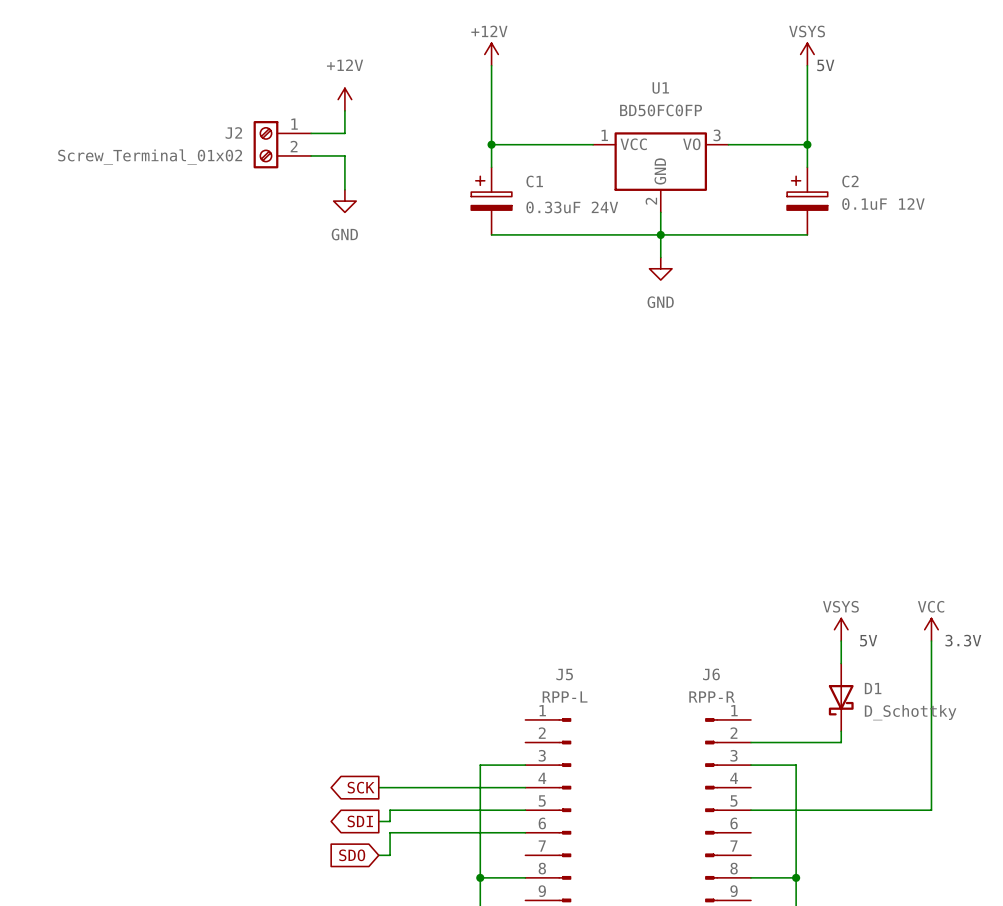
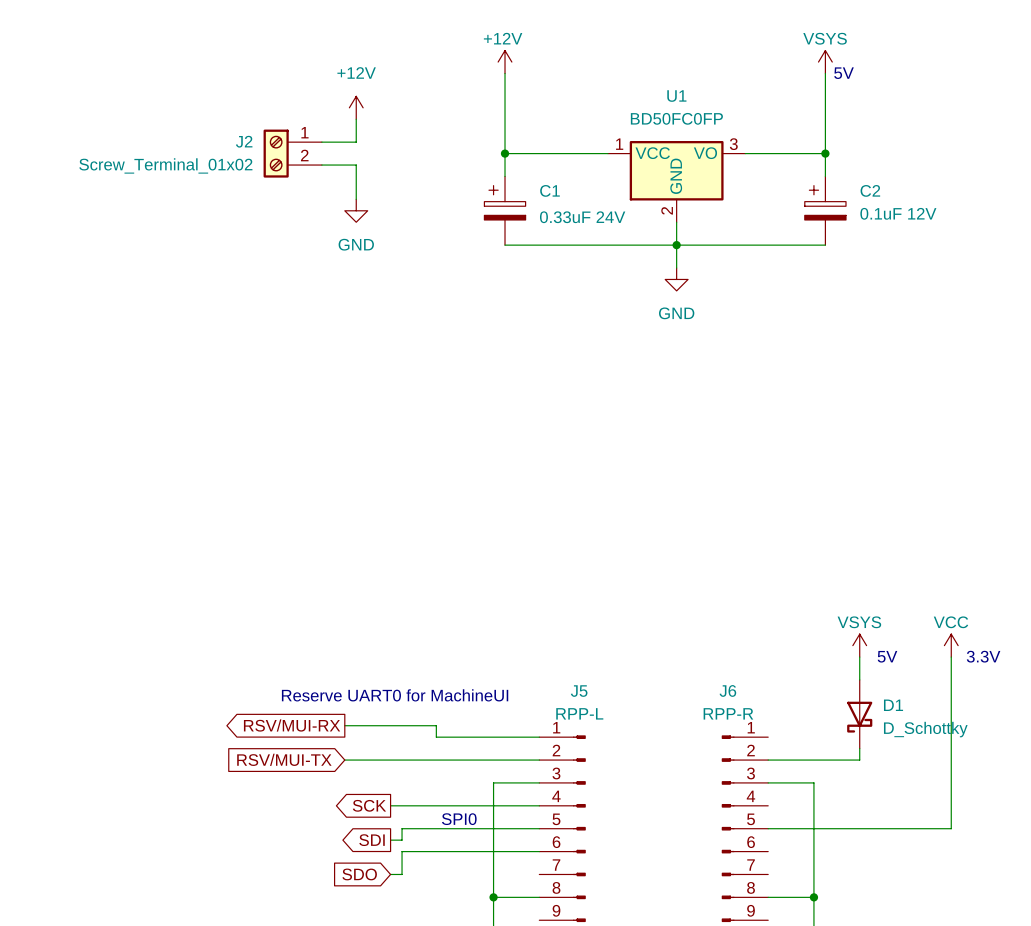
text: none -> Reserve UART0 for MachineUI (395, 695)
wire: none -> (344, 725) (436, 725) (436, 737) (539, 737)
global label: none -> RSV/MUI-RX (292, 725)
wire: none -> (344, 760) (539, 760)
global label: none -> RSV/MUI-TX (284, 759)
text: none -> SPI0 (459, 819)

